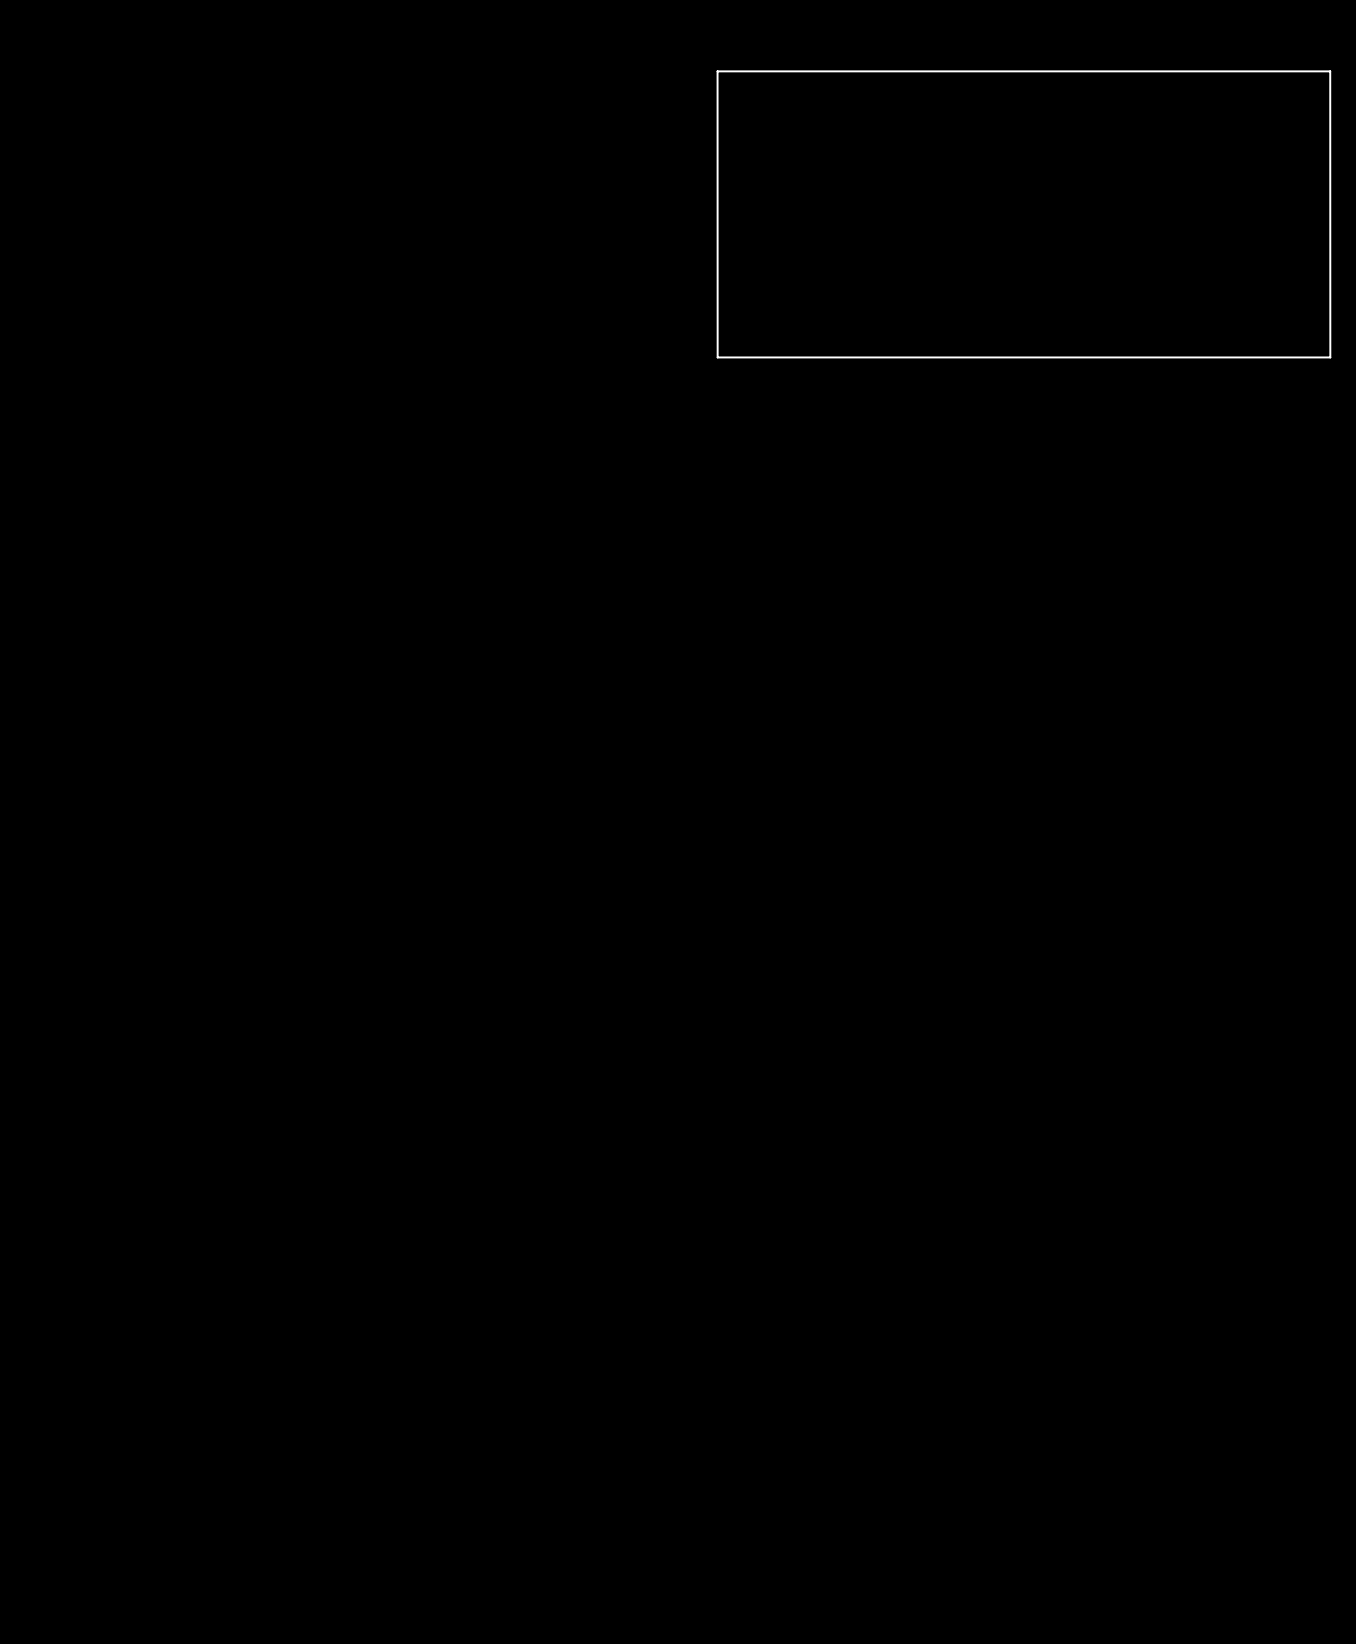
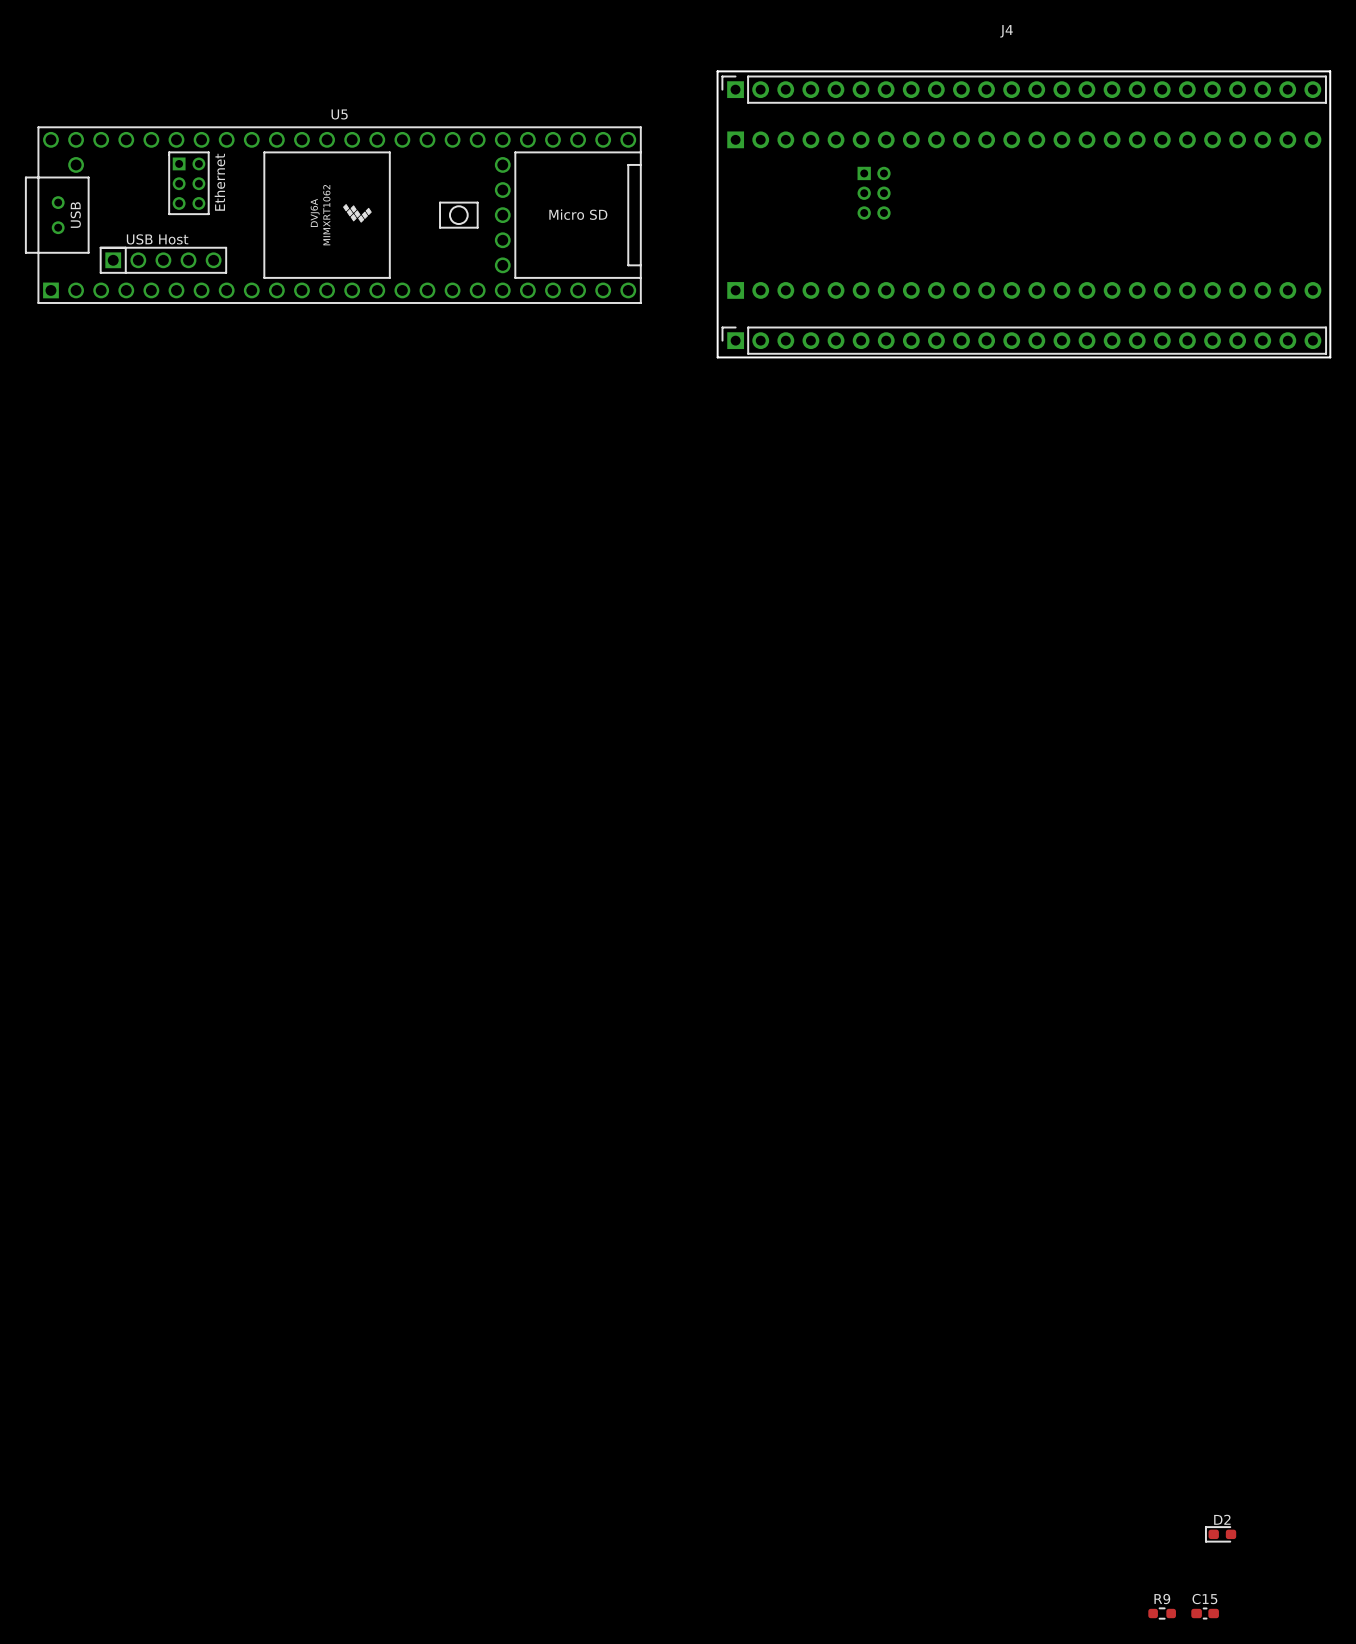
U5: none -> (333, 215)
J4: none -> (1024, 215)
D2: none -> (1220, 1534)
R9: none -> (1162, 1613)
C15: none -> (1205, 1613)

